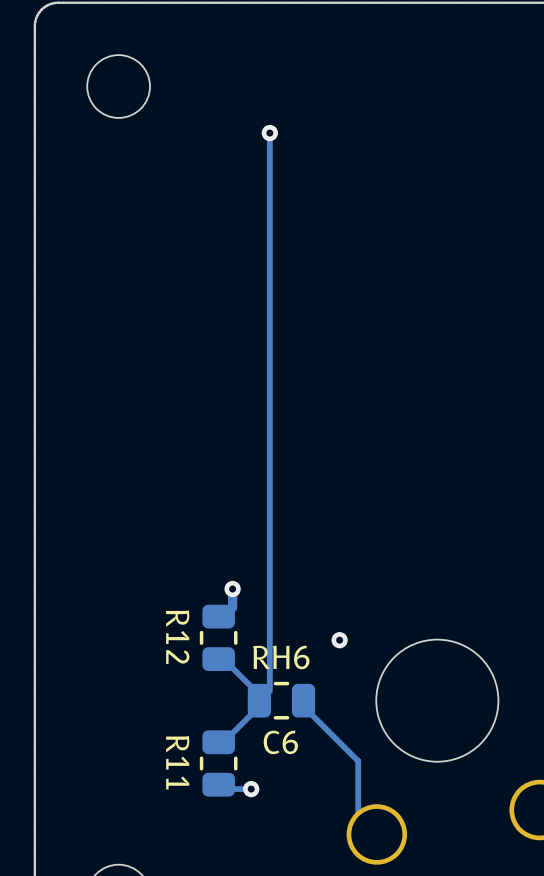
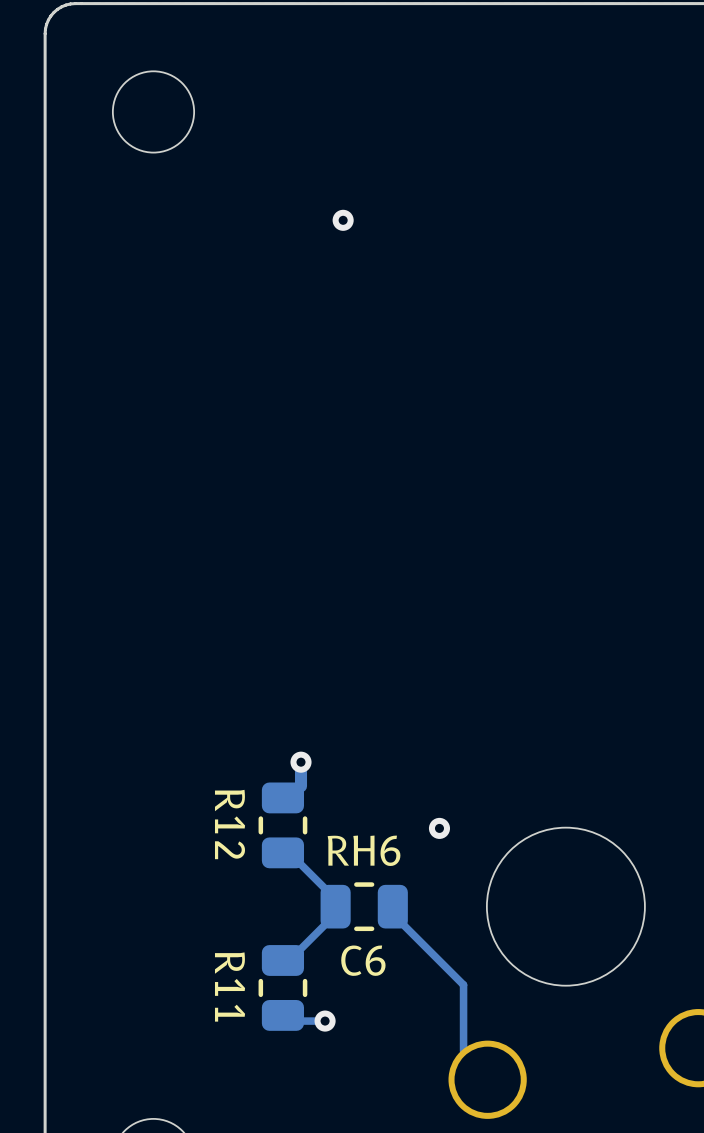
track: (269, 133) (269, 691) -> none
via position: (269, 133) -> (343, 220)

